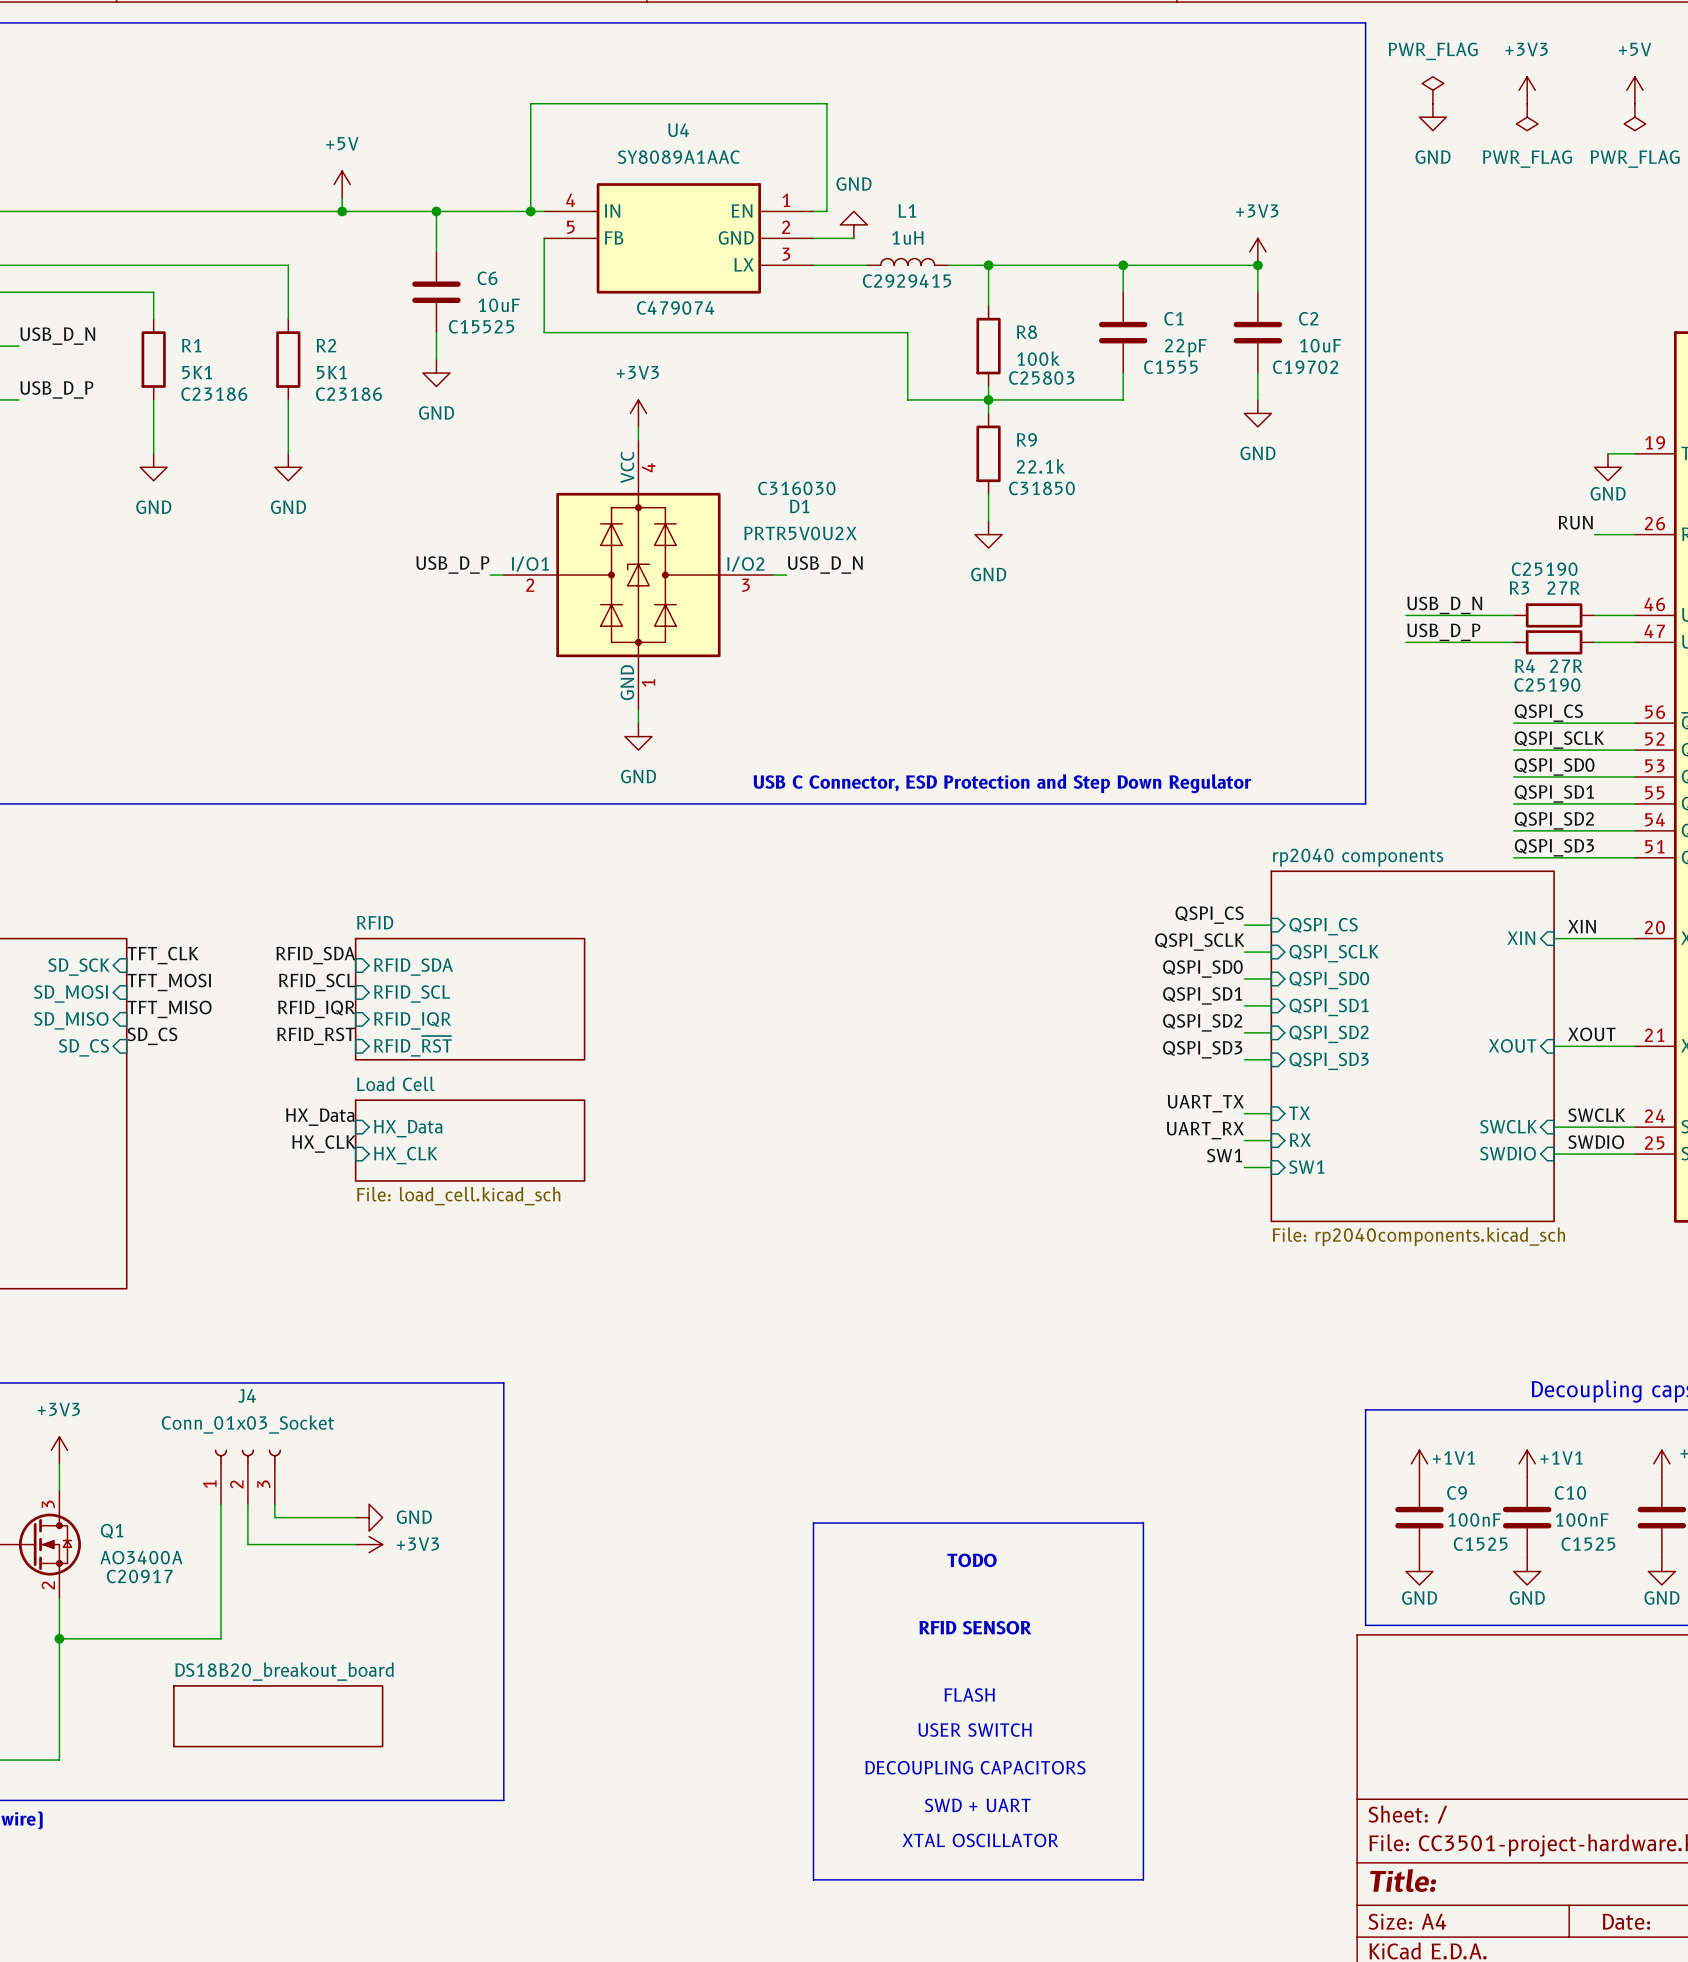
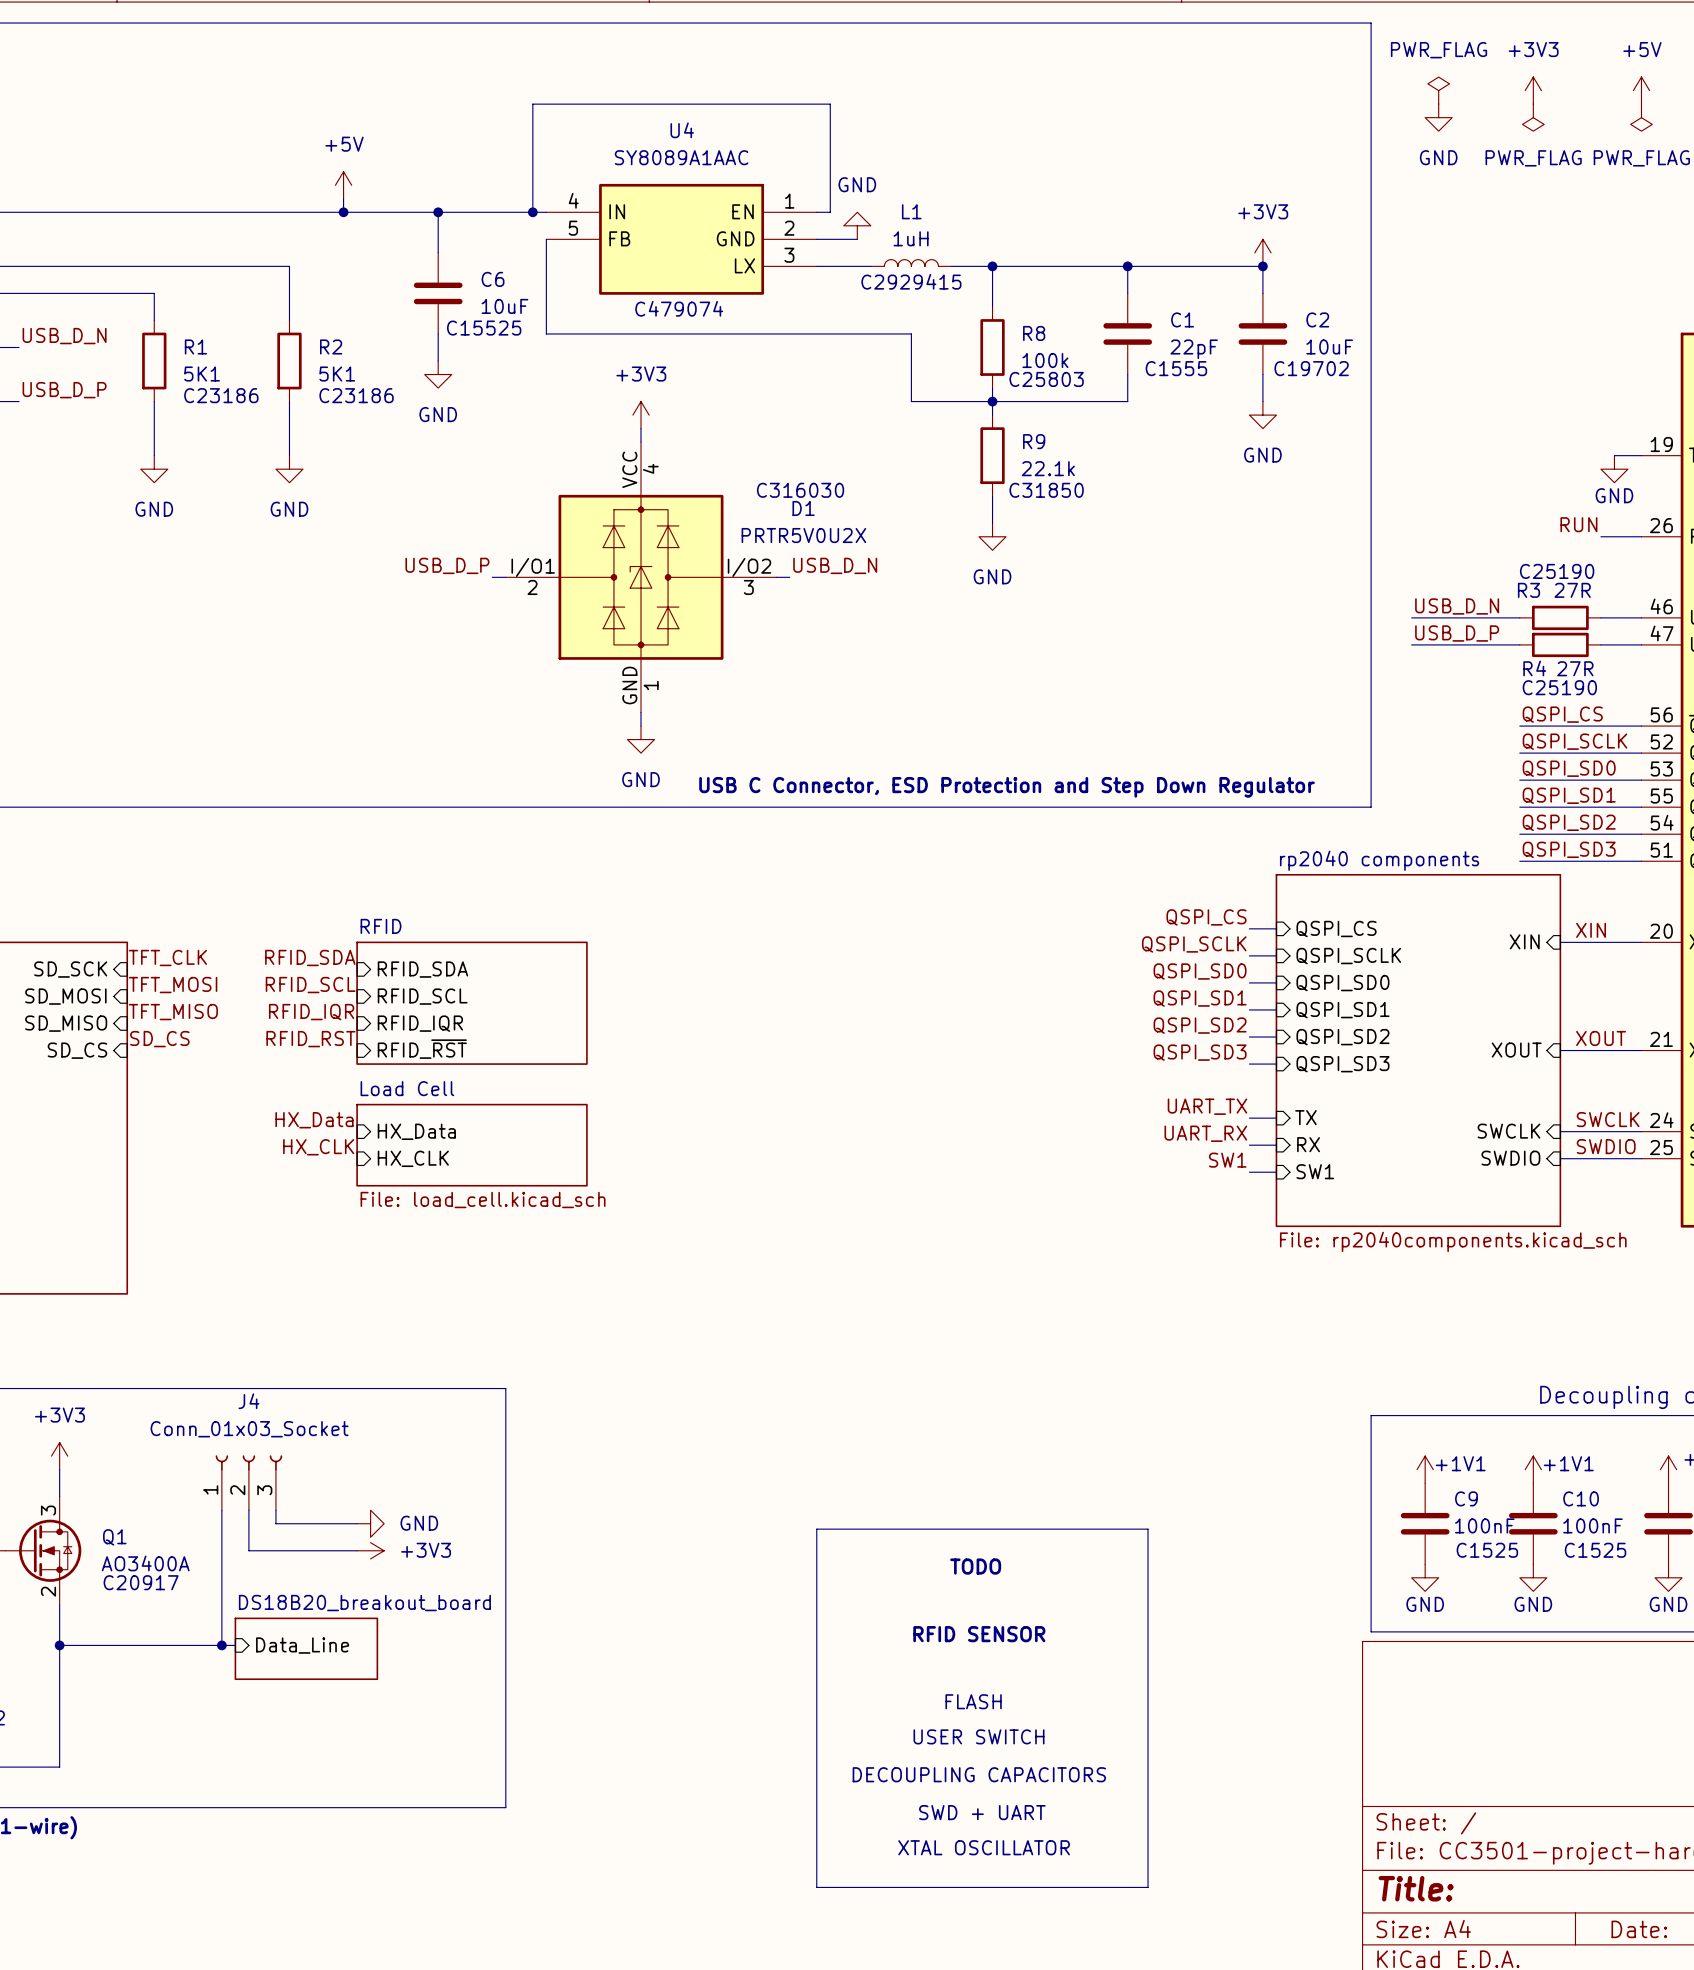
wire: none -> (221, 1645) (235, 1645)
junction: none -> (221, 1645)
sheet pin: none -> Data_Line (302, 1645)
sheet DS18B20_breakout_board name position: DS18B20_breakout_board (284, 1671) -> DS18B20_breakout_board (364, 1603)
sheet DS18B20_breakout_board shape: [173, 1685, 384, 1748] -> [234, 1617, 379, 1681]

